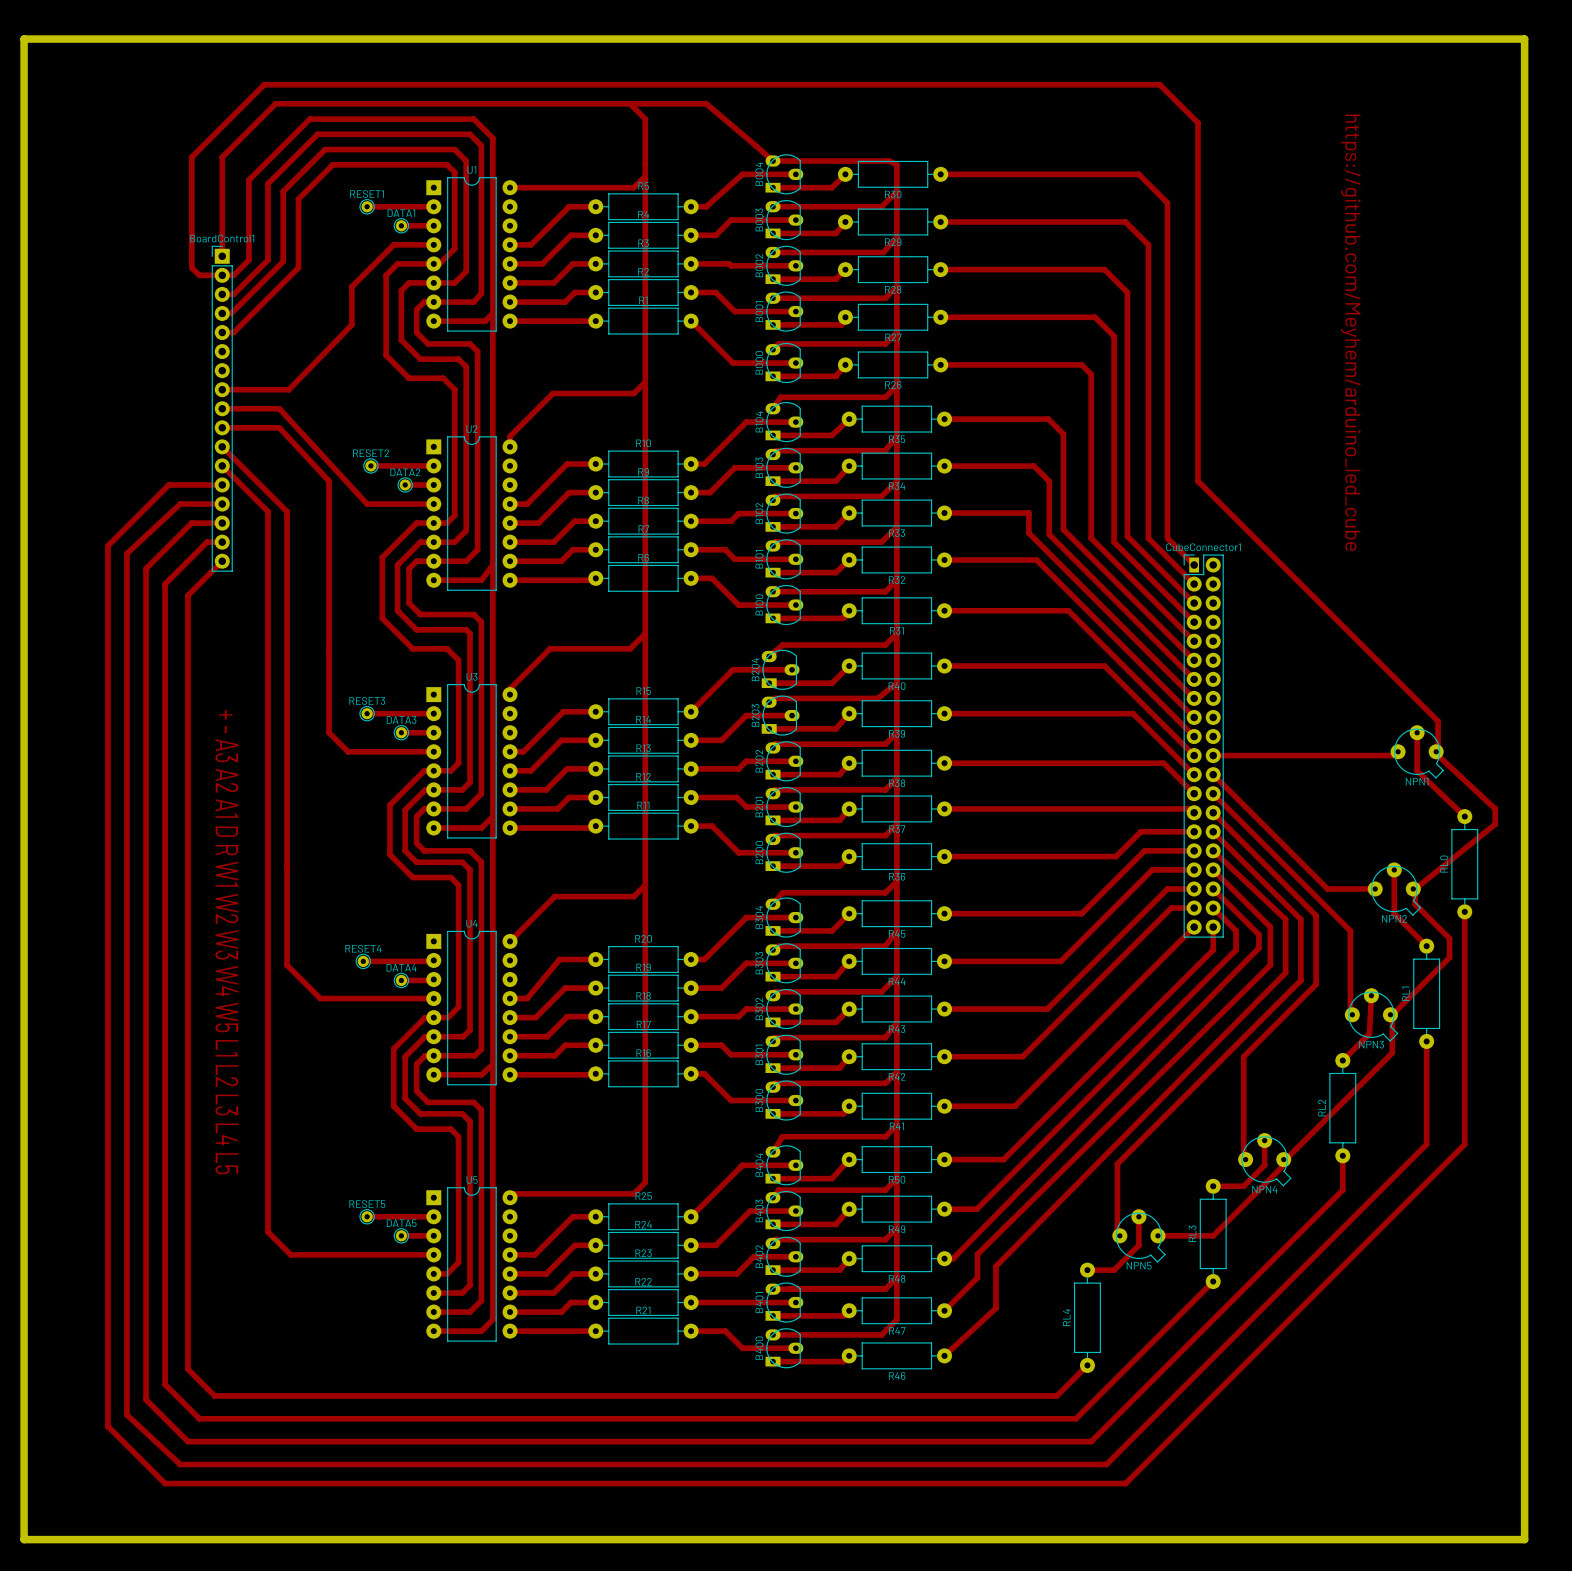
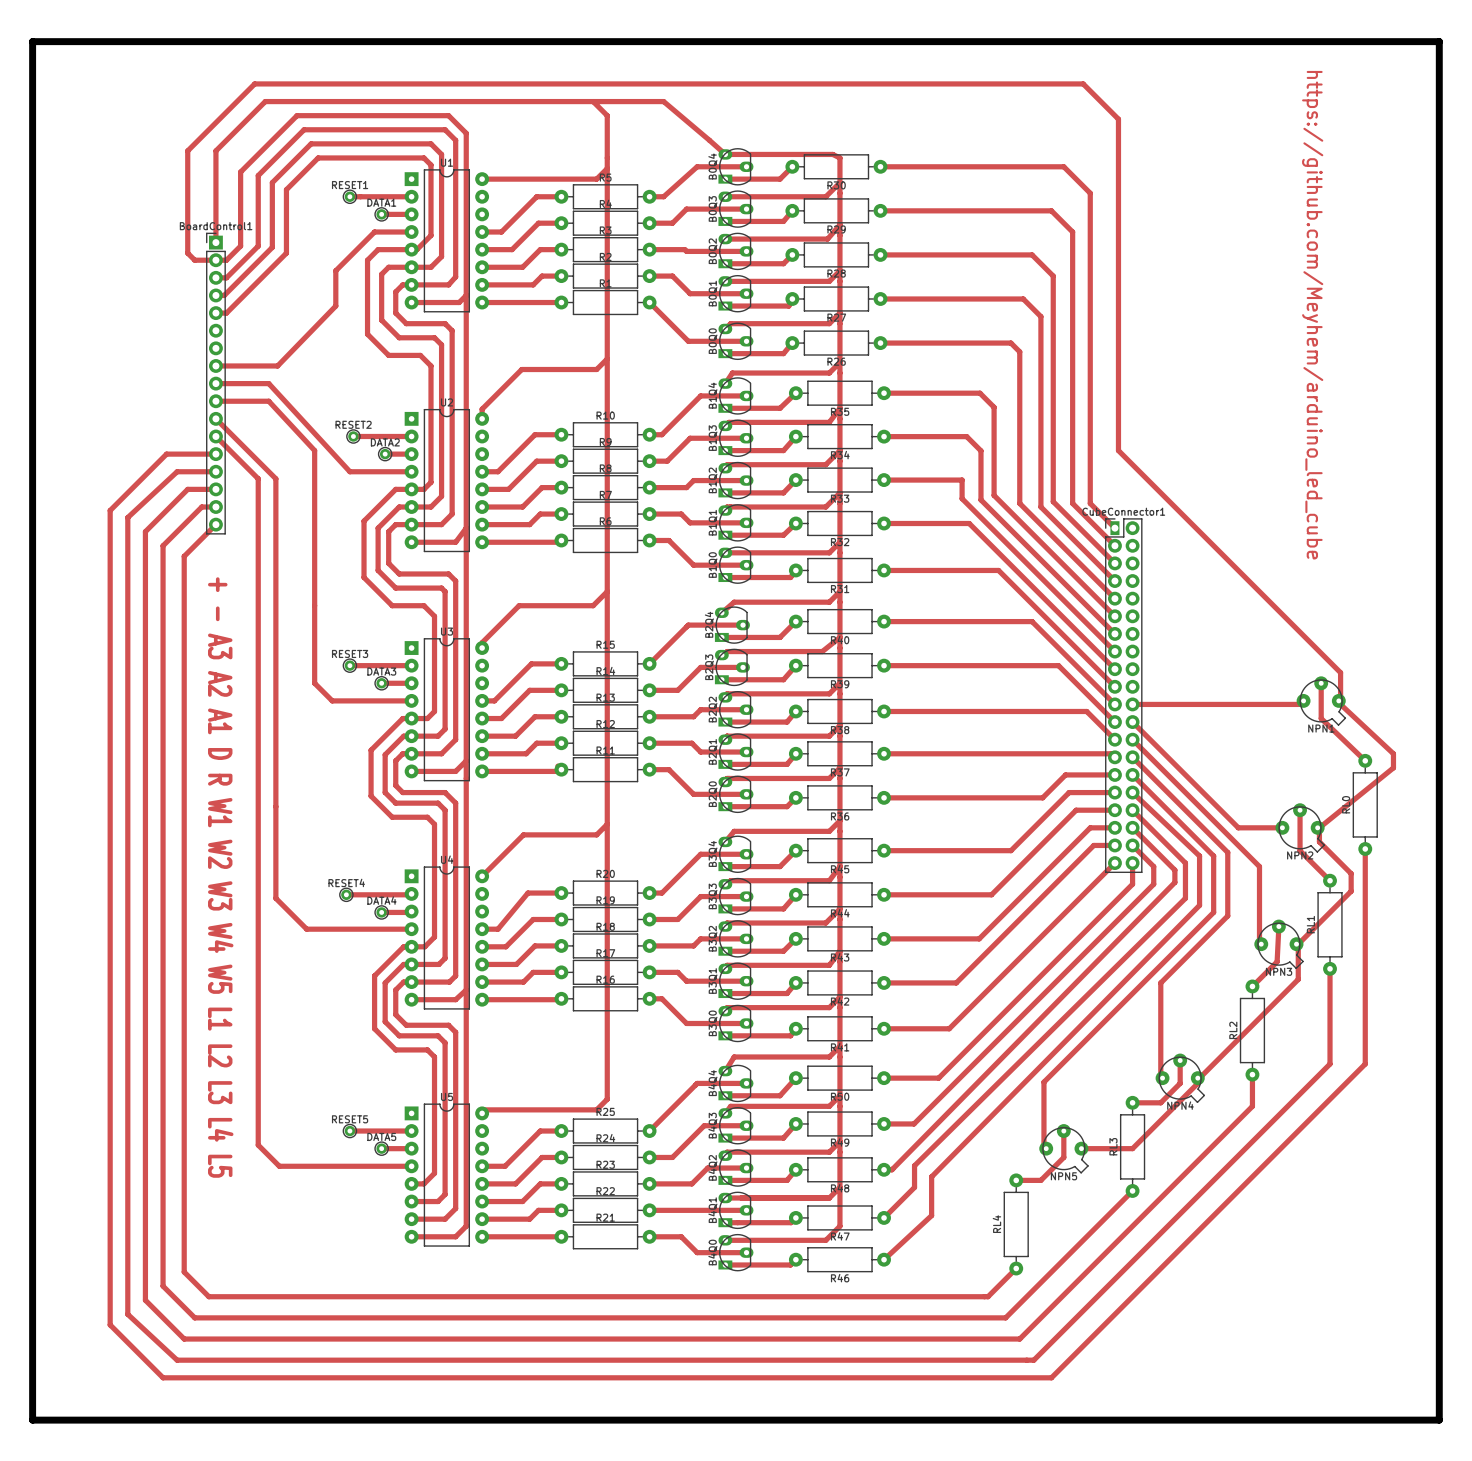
board edge: (1524, 39) (1524, 1539) (24, 1539) (24, 1529) -> (1420, 41) (1439, 41) (1439, 1420) (32, 1420)
text position: https://github.com/Meyhem/arduino_led_cube (1350, 332) -> https://github.com/Meyhem/arduino_led_cube (1312, 315)

